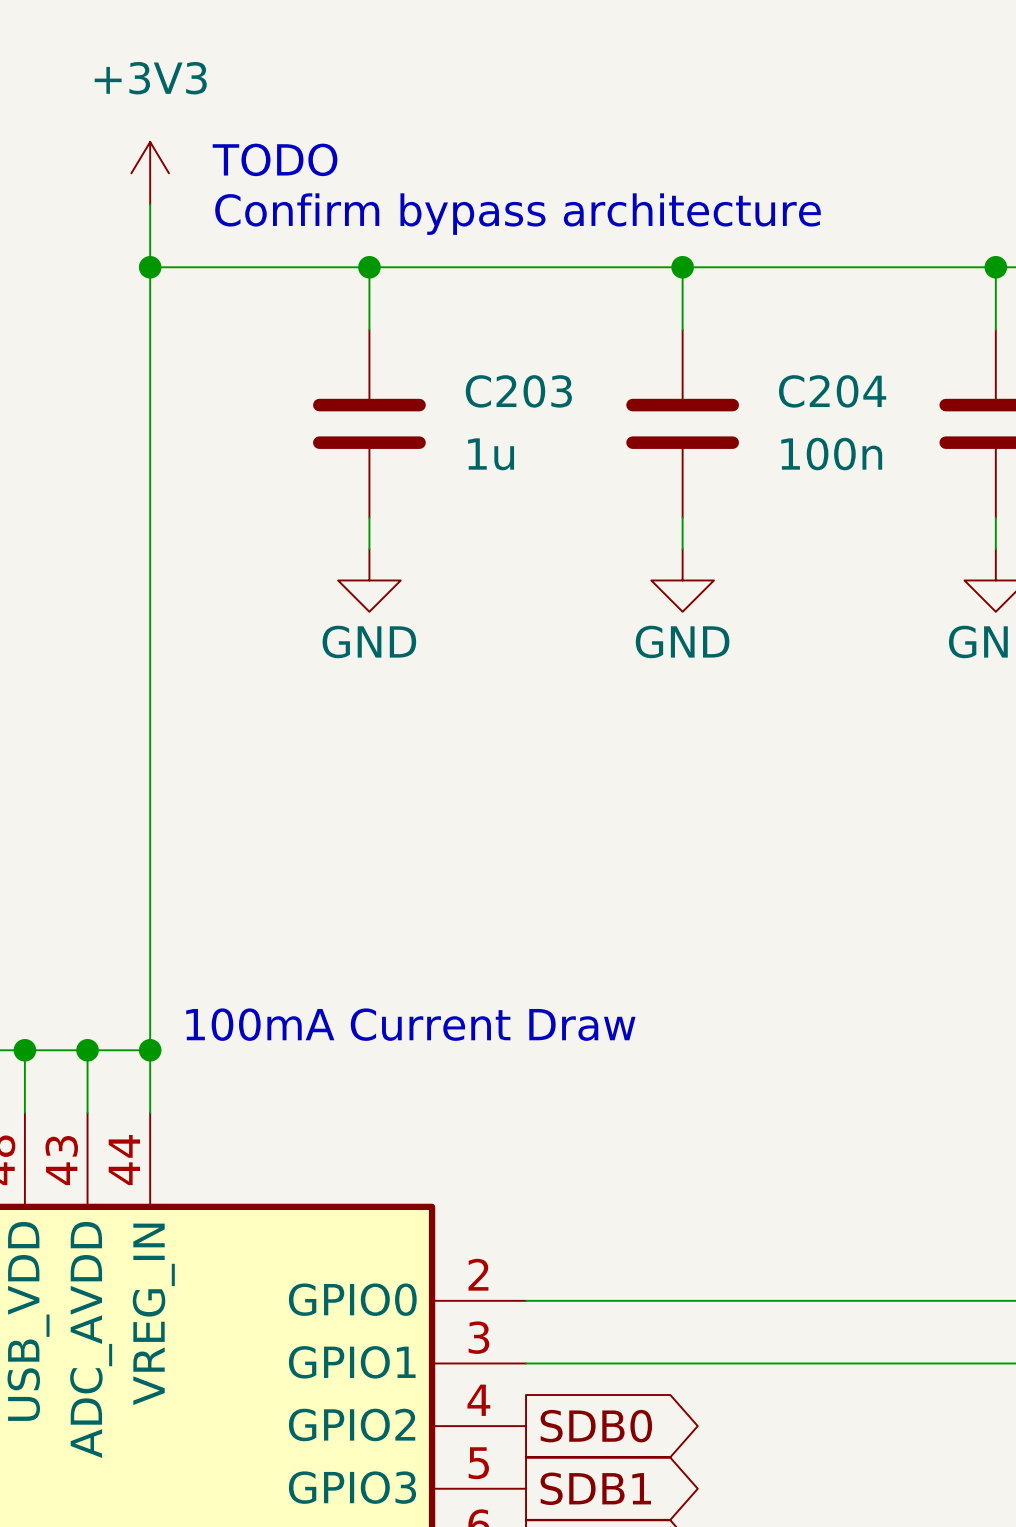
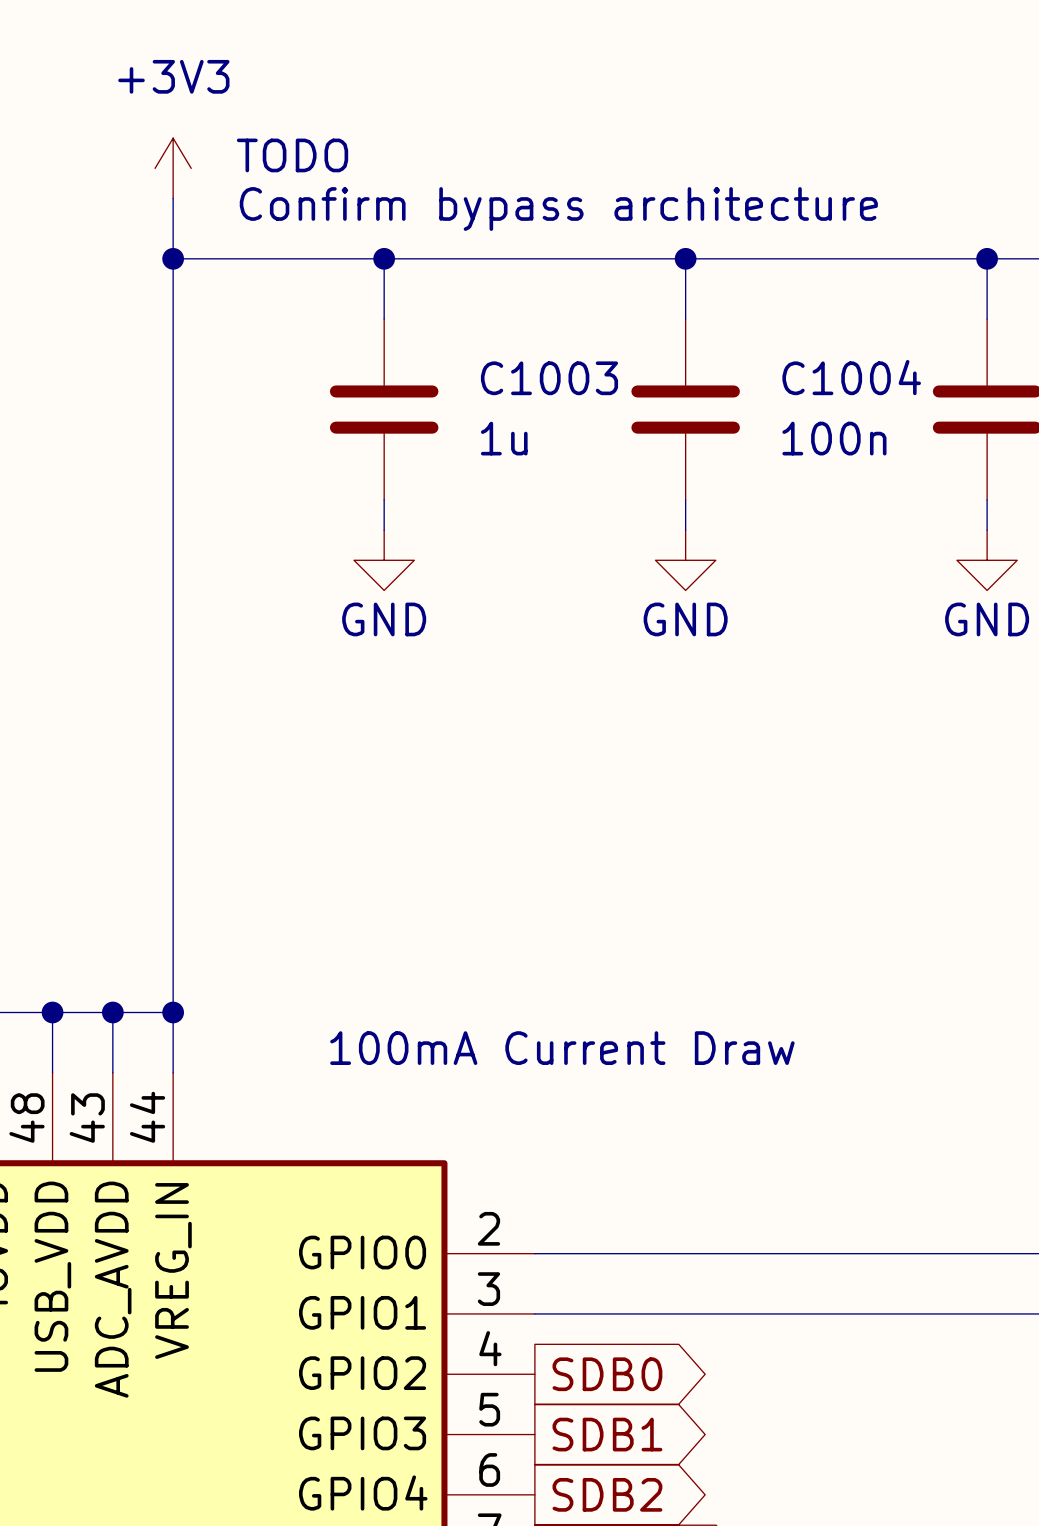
C203 name: C203 (518, 391) -> C1003 (549, 378)
C204 name: C204 (832, 391) -> C1004 (851, 377)
text position: 100mA Current Draw (410, 1024) -> 100mA Current Draw (562, 1048)

